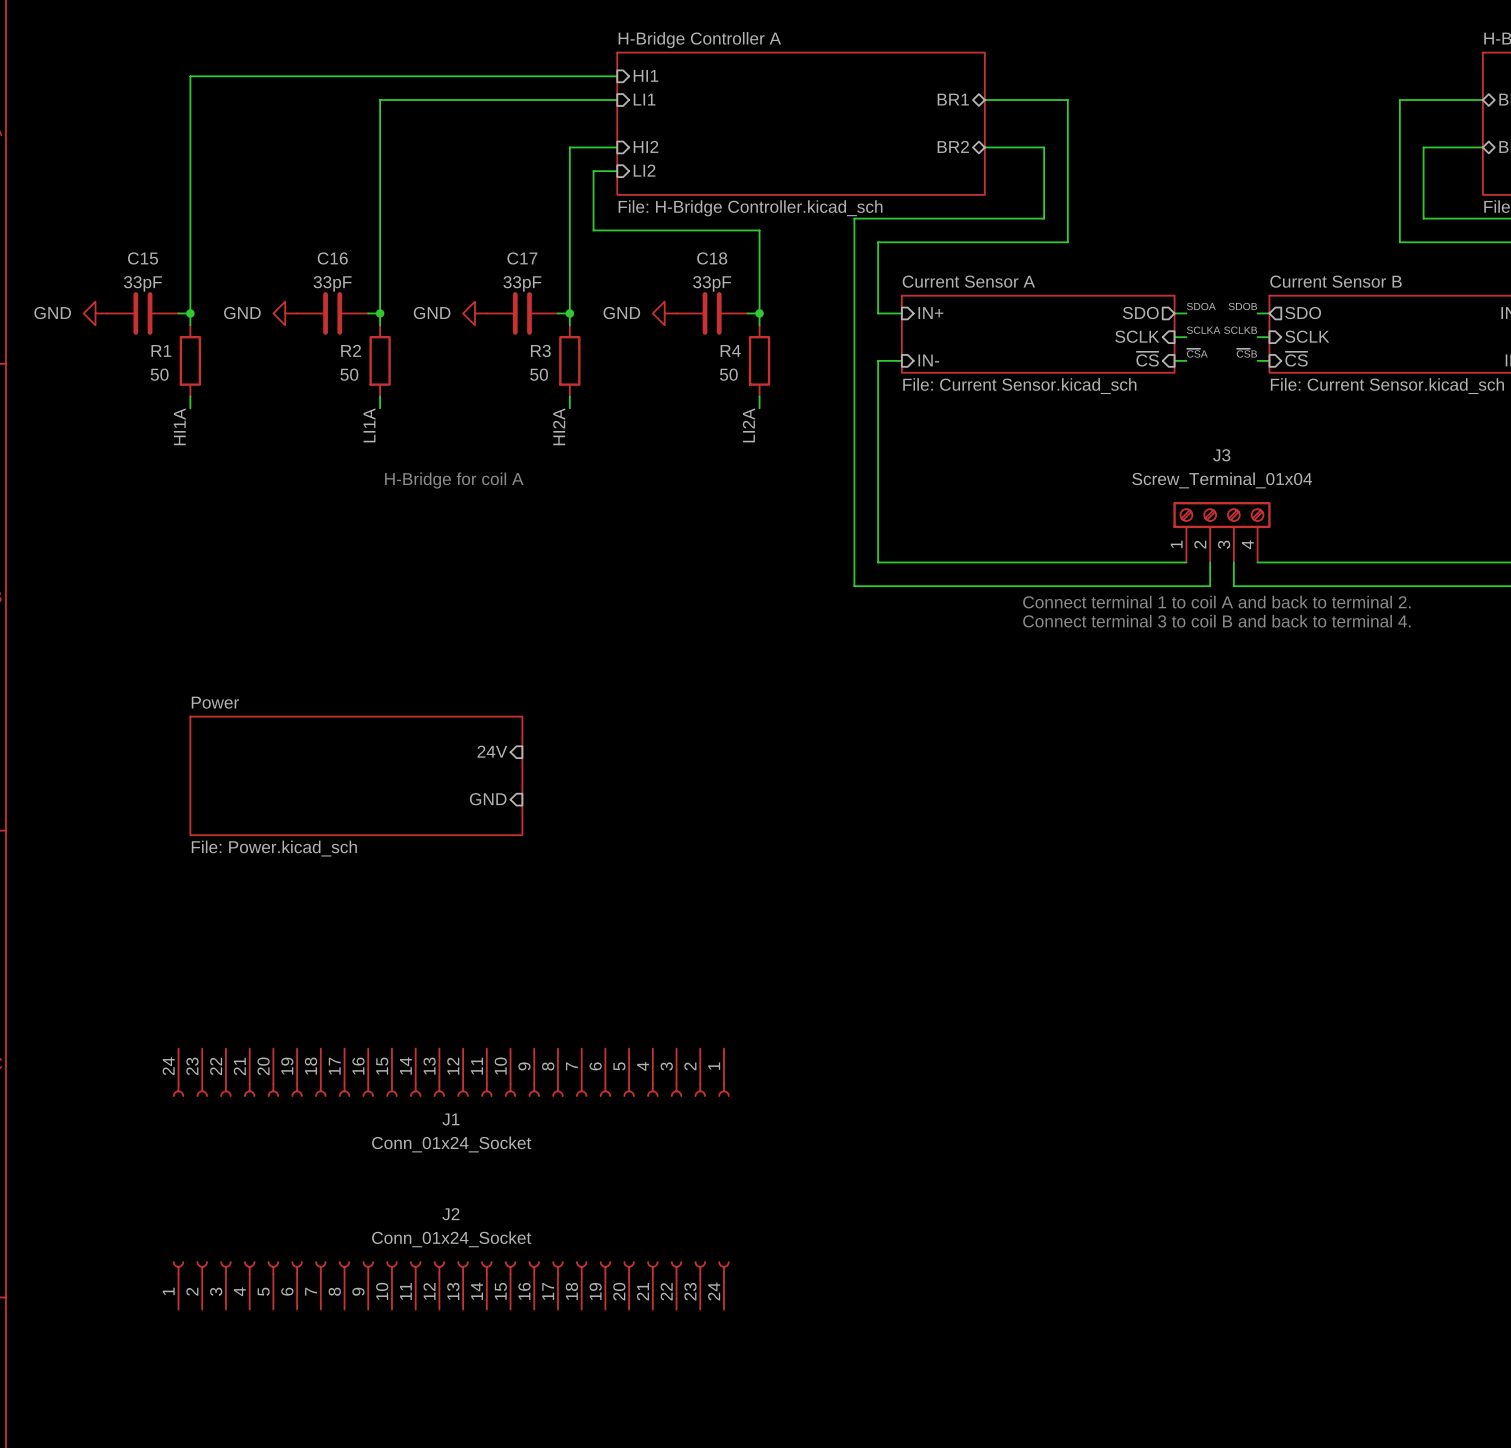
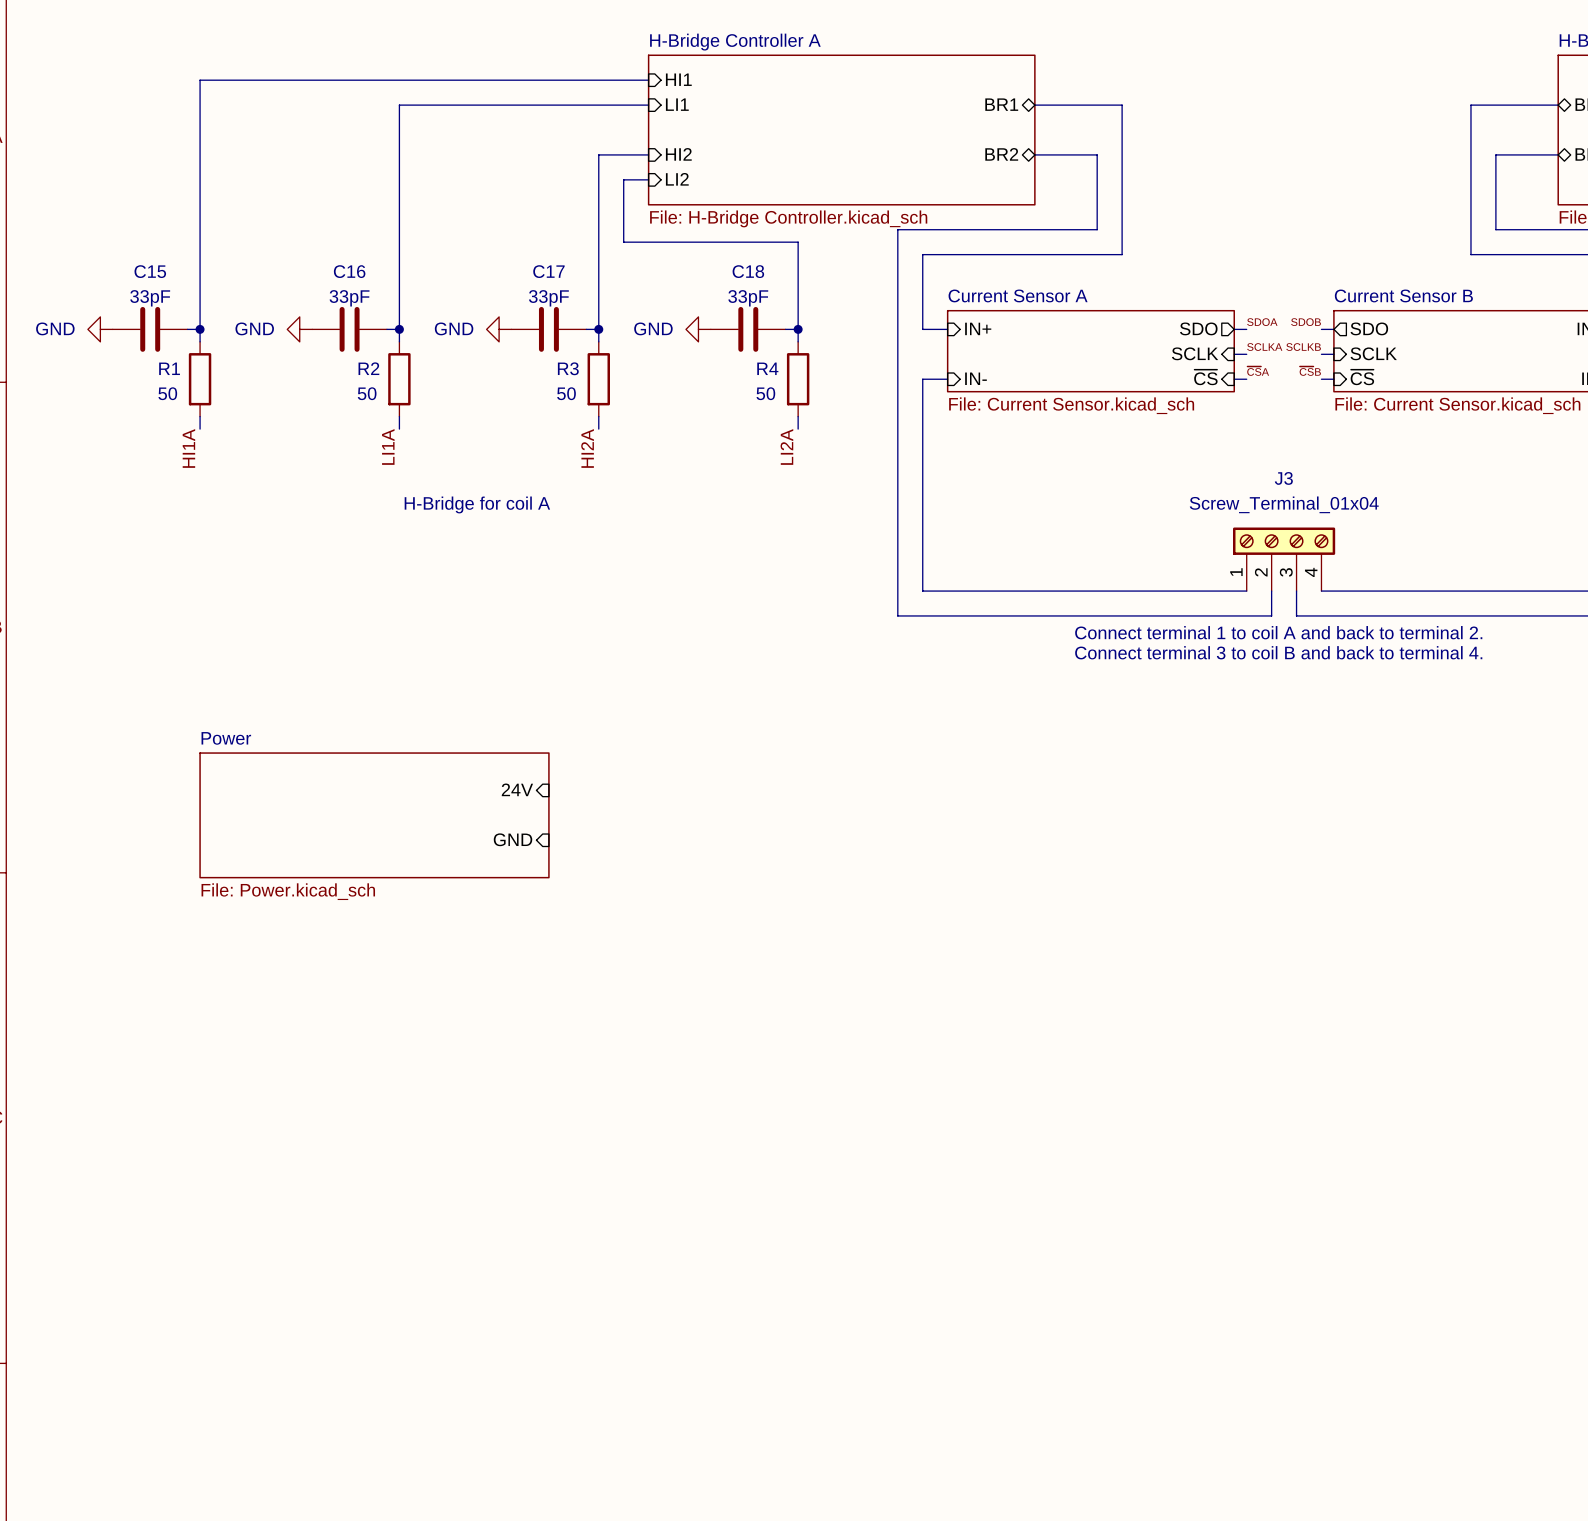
J1: Conn_01x24_Socket (451, 1072) -> none
J2: Conn_01x24_Socket (451, 1285) -> none

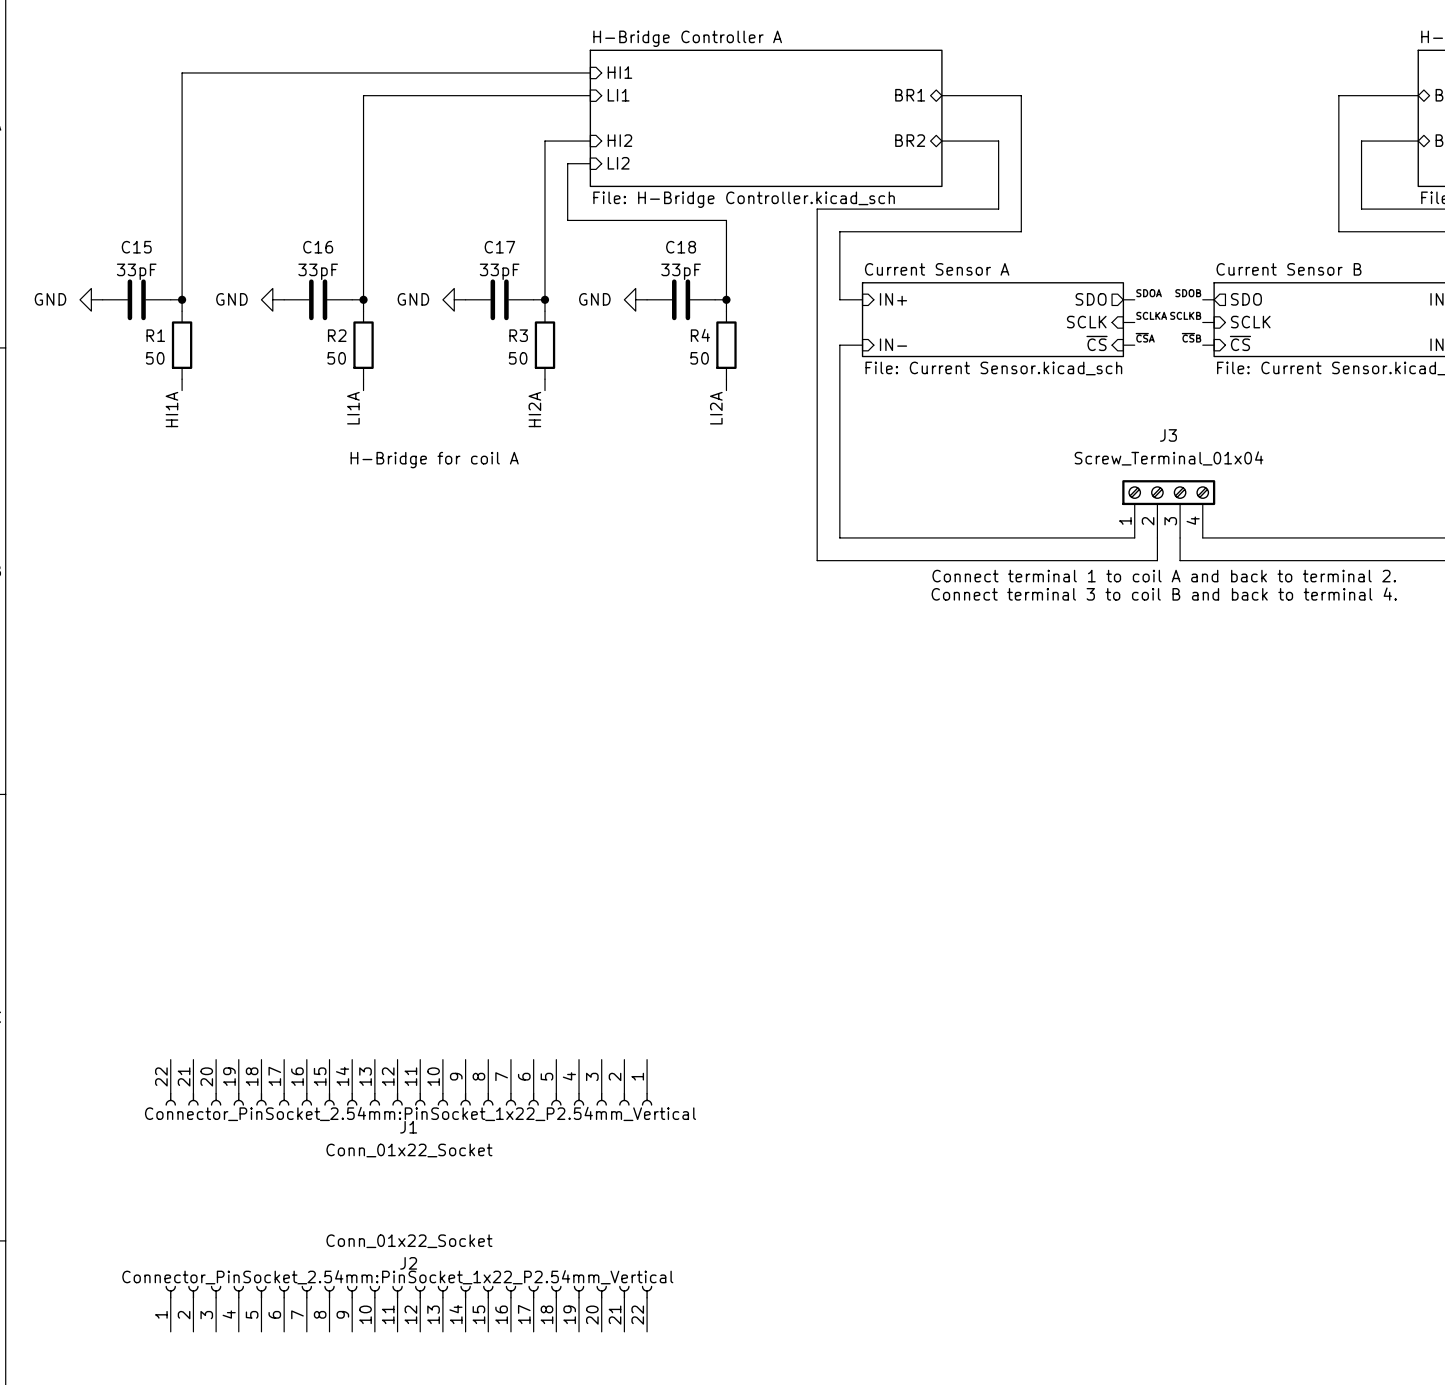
sheet pin: 24V (517, 789) -> none
sheet Power: File: Power.kicad_sch (374, 815) -> none
sheet pin: GND (513, 839) -> none
J1: none -> Conn_01x22_Socket (408, 1082)
J2: none -> Conn_01x22_Socket (408, 1308)

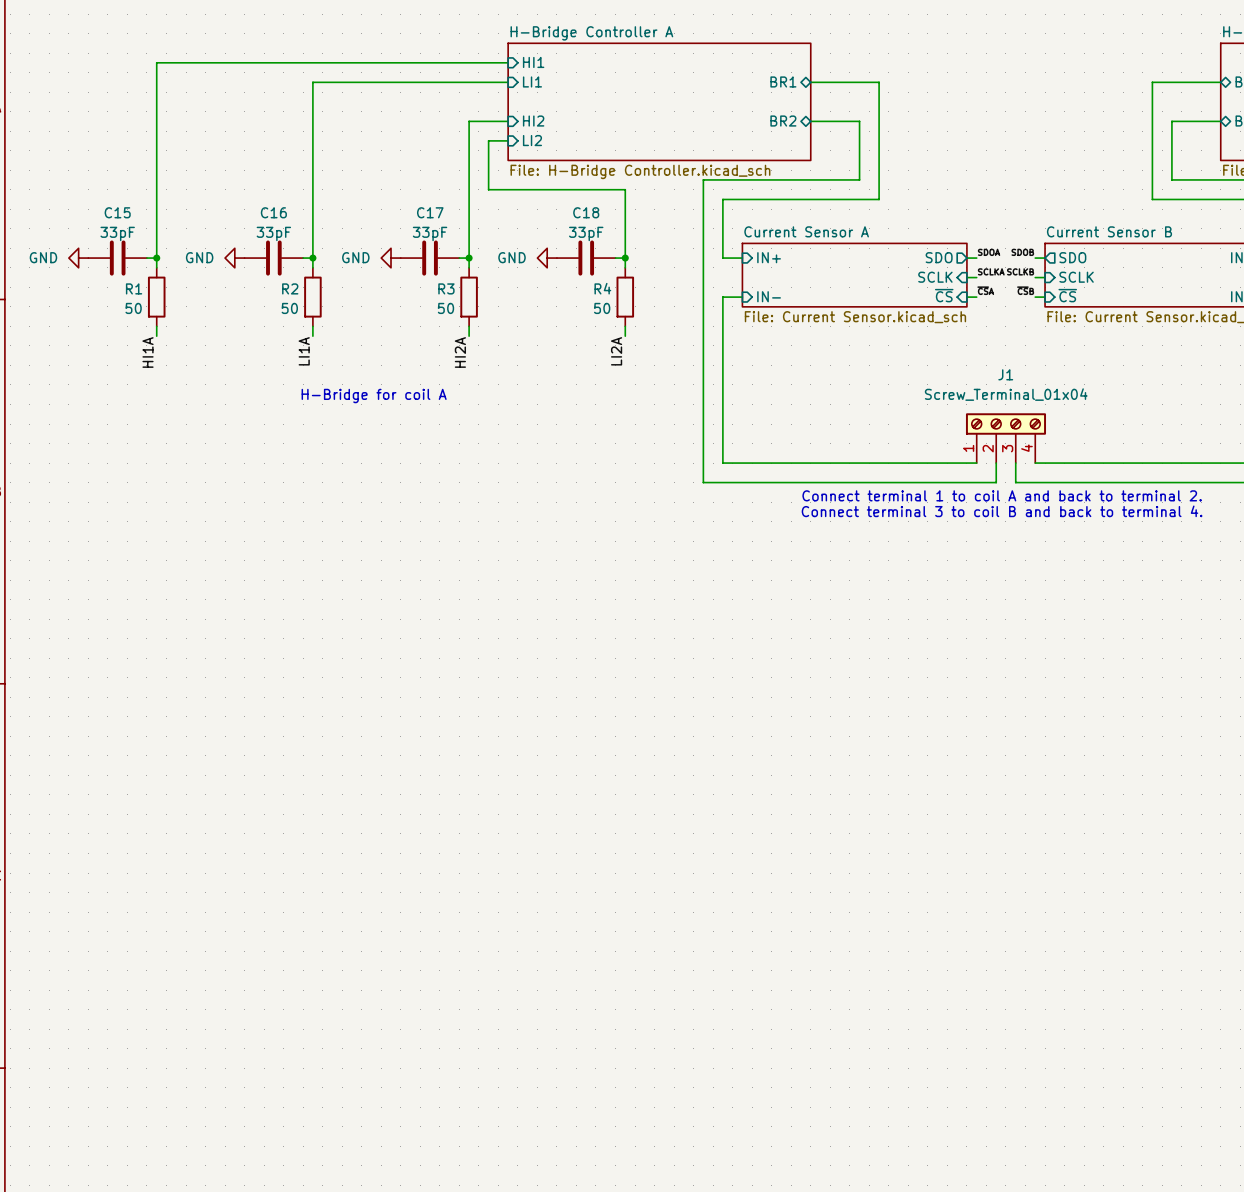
J3 name: J3 (1168, 435) -> J1 (1005, 374)
J1: Conn_01x22_Socket (408, 1082) -> none
J2: Conn_01x22_Socket (408, 1308) -> none

